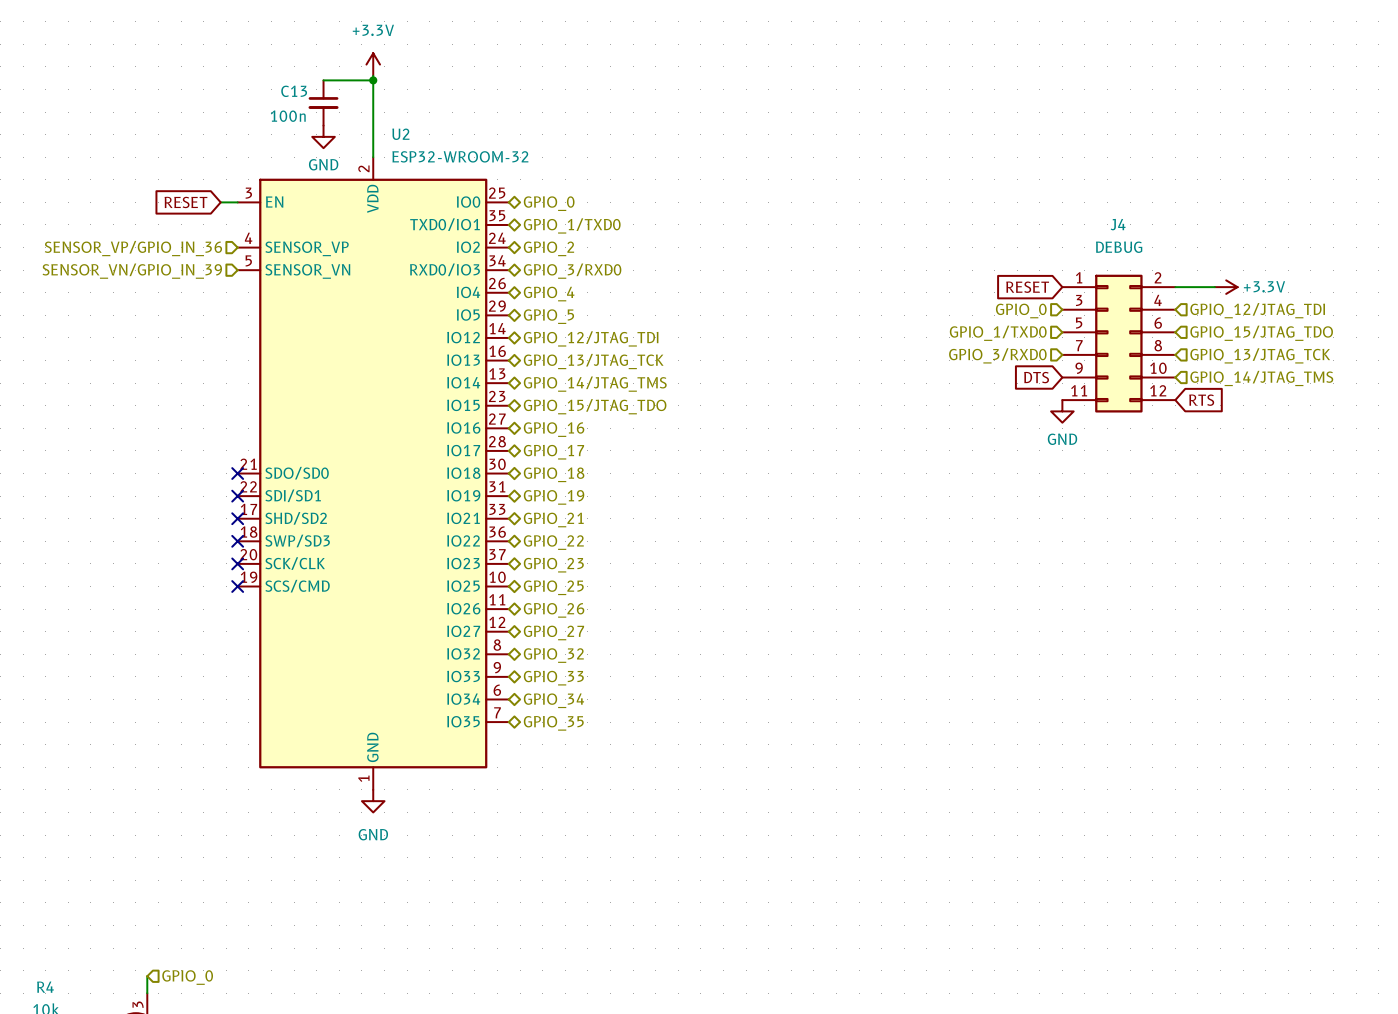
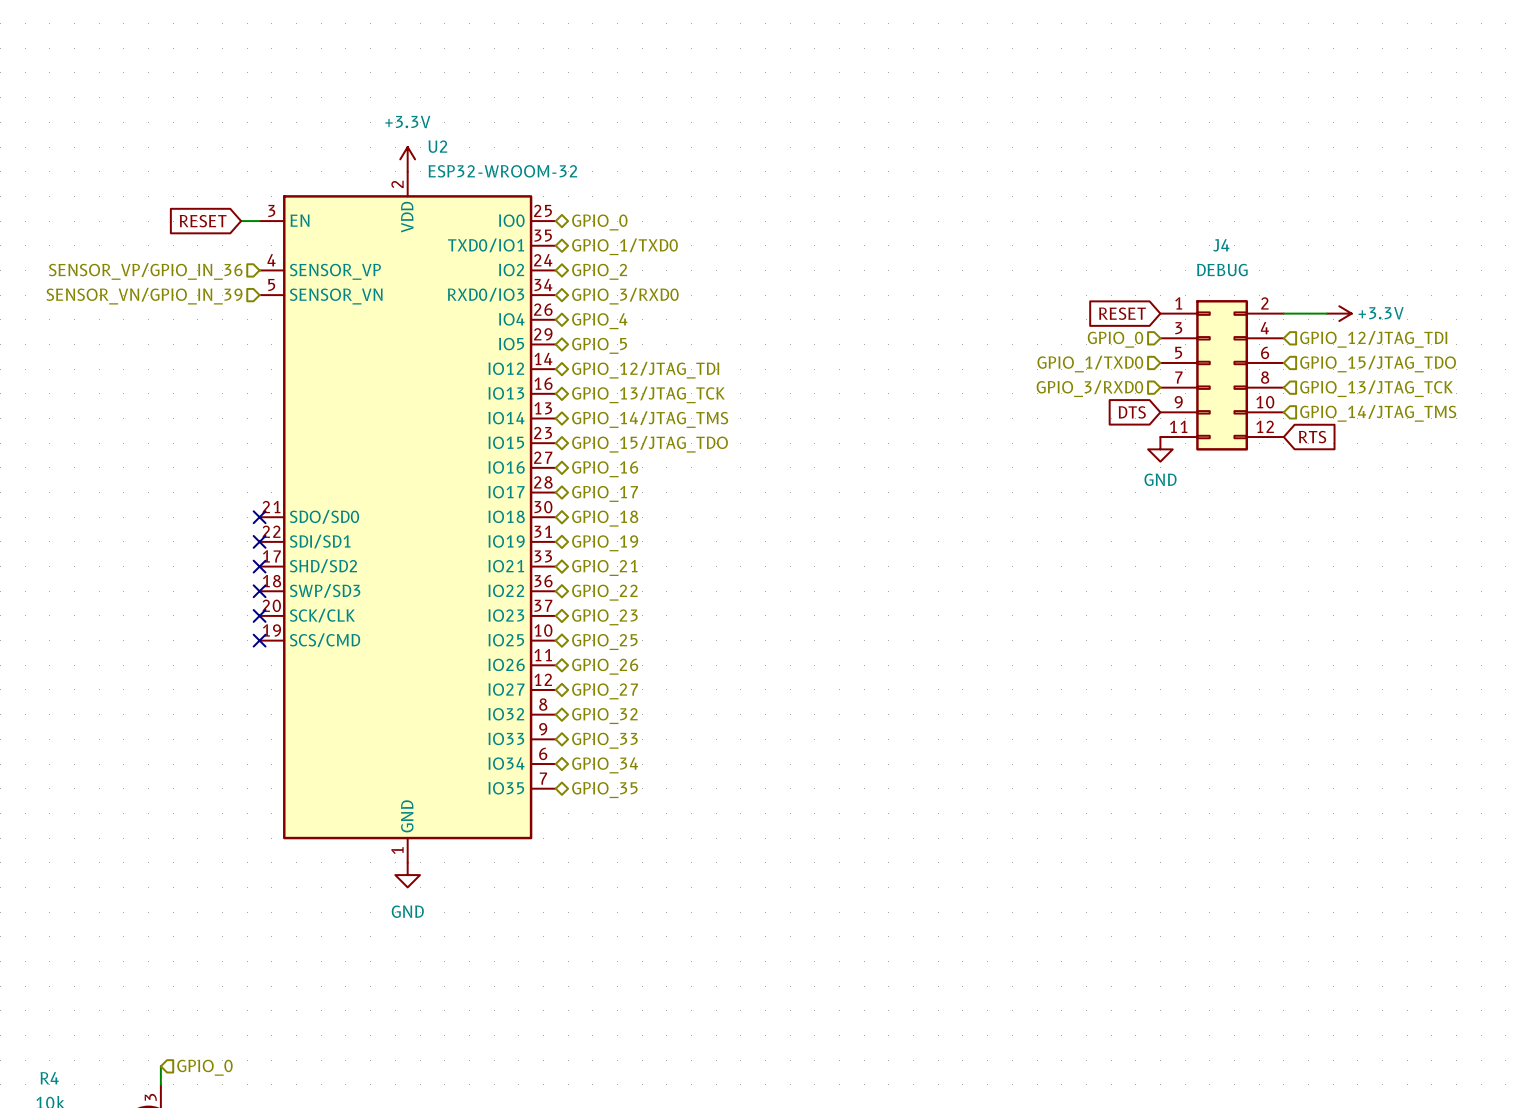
power symbol position: +3.3V (373, 64) -> +3.3V (407, 159)
wire: (373, 75) (373, 157) -> none
wire: (323, 80) (373, 80) -> none
junction: (373, 80) -> none
C13: 100n (323, 102) -> none
power symbol: GND (323, 136) -> none

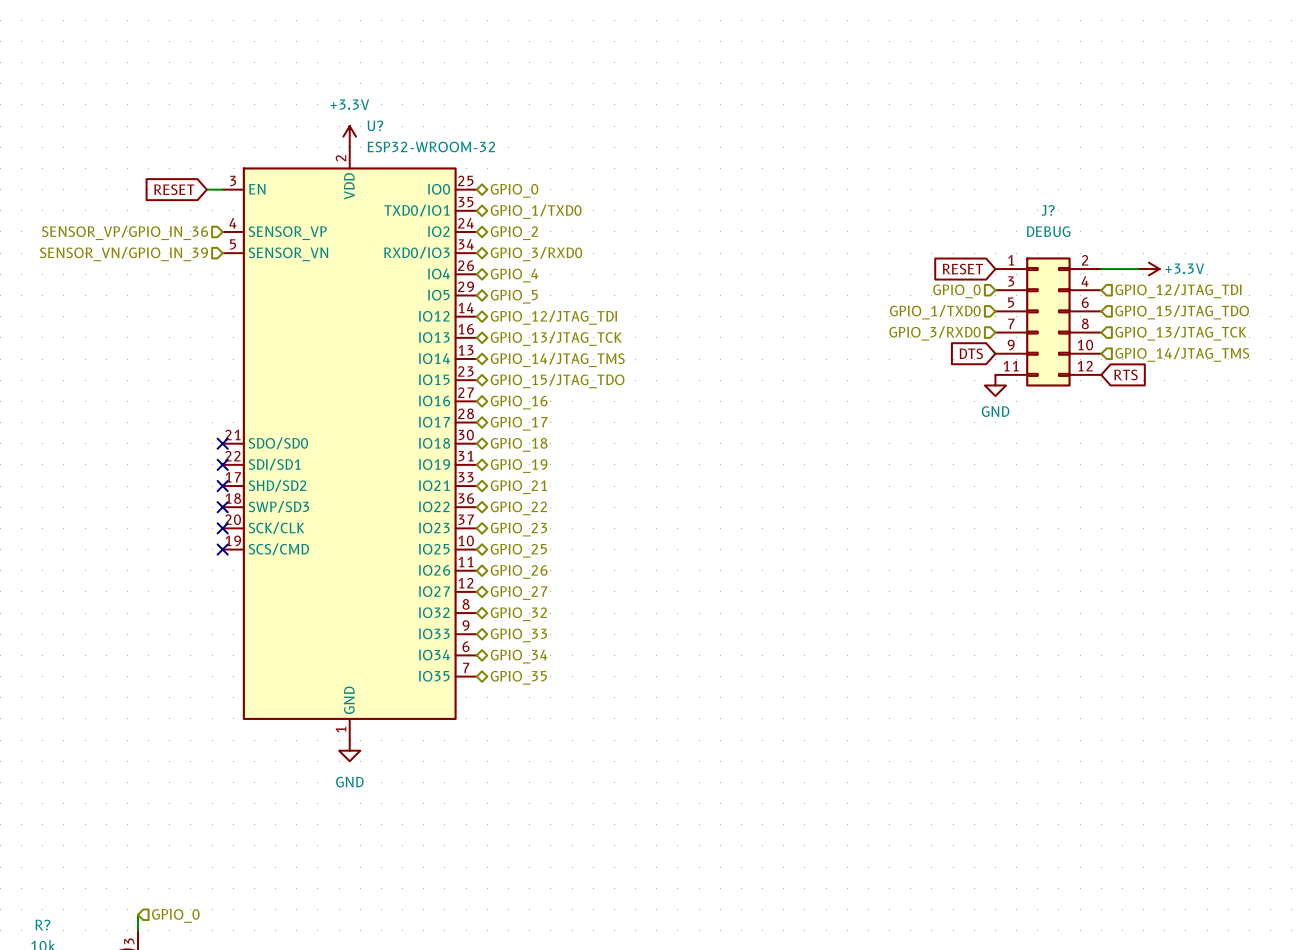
U2 name: U2 (437, 146) -> U? (375, 125)
J4 name: J4 (1221, 245) -> J? (1048, 210)
R4 name: R4 (49, 1078) -> R? (42, 925)

